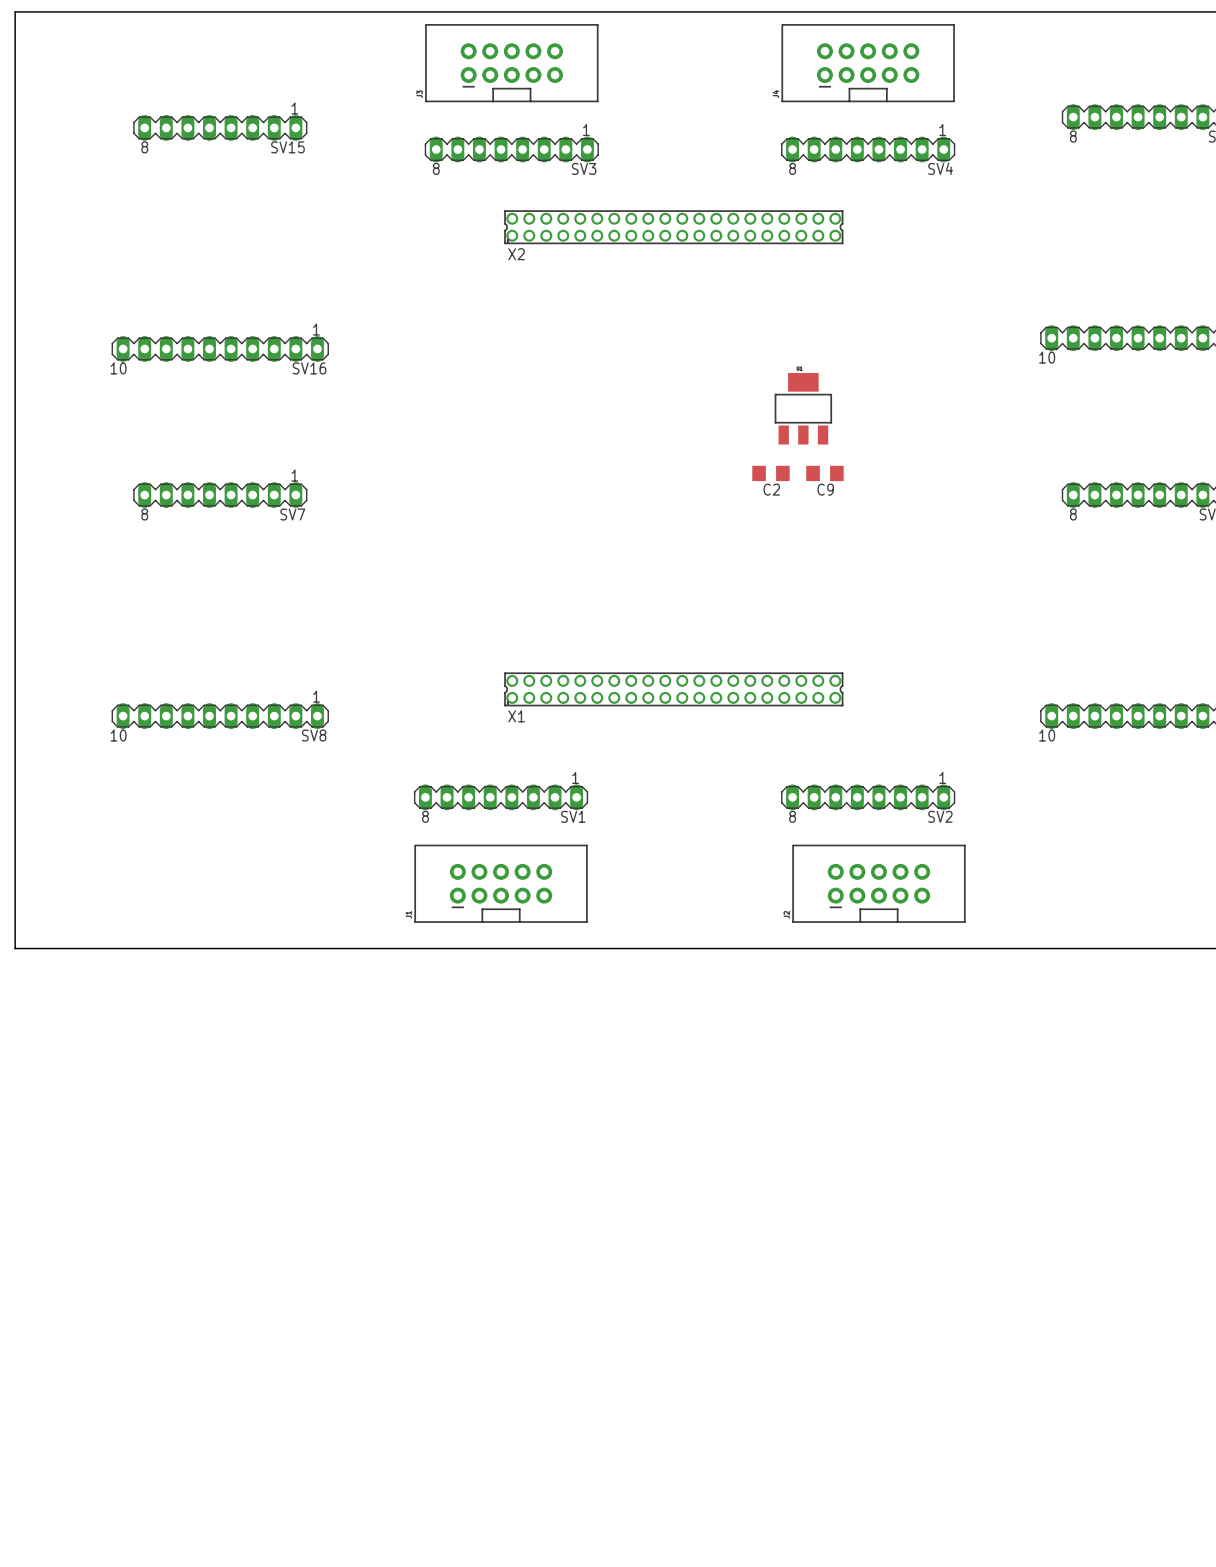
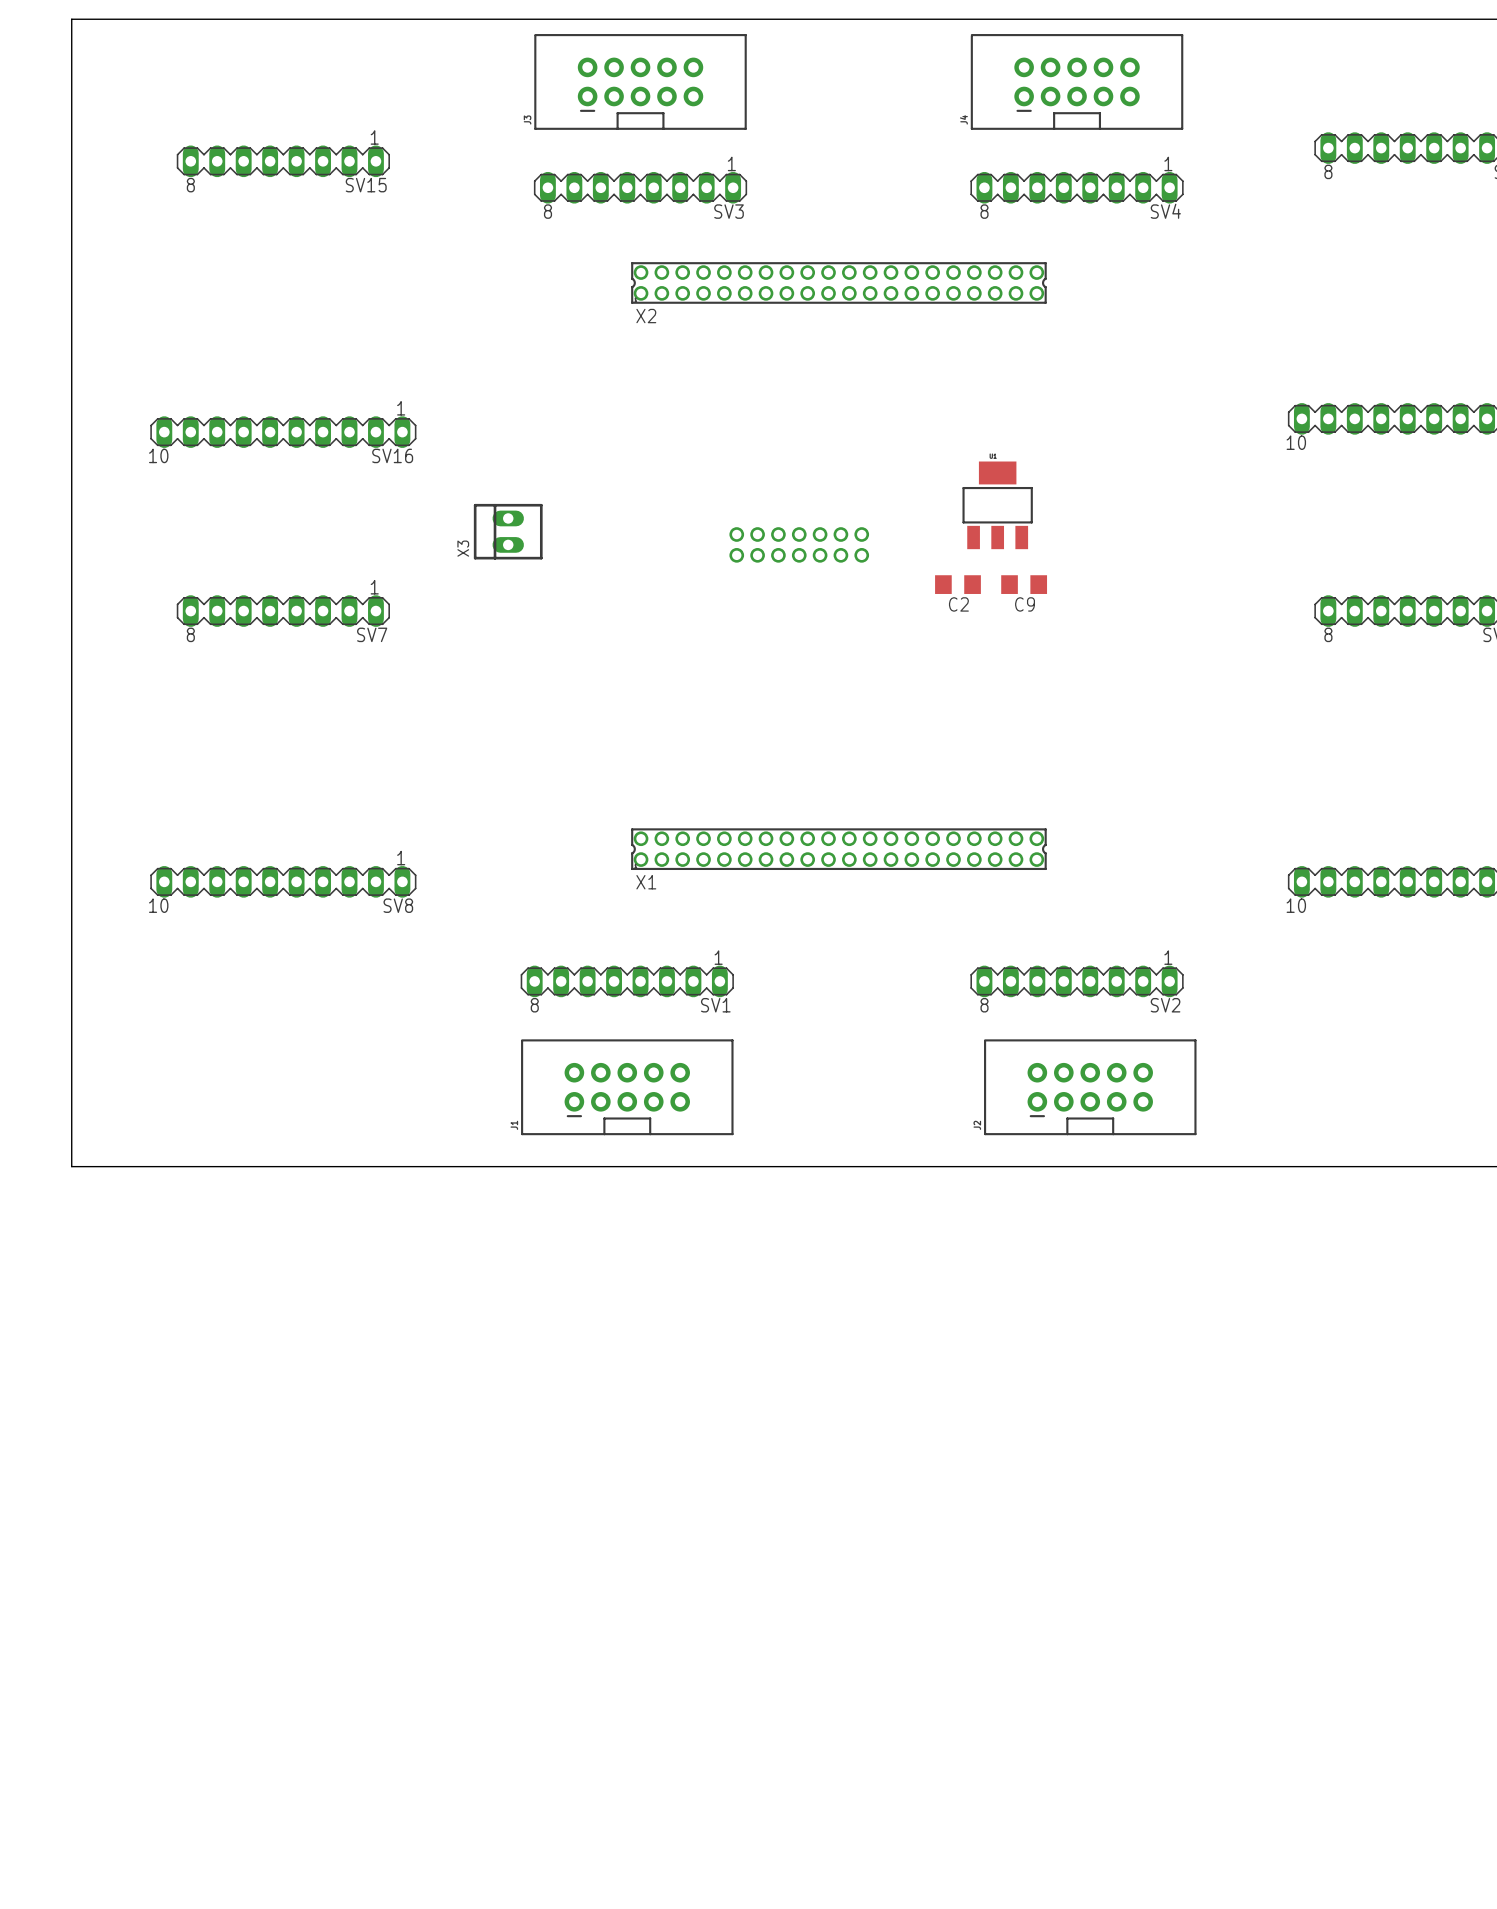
board edge: (47, 11) (15, 11) (15, 948) (47, 948) -> (71, 19) (71, 1166)
X3: none -> (508, 531)
part: none -> (799, 544)

